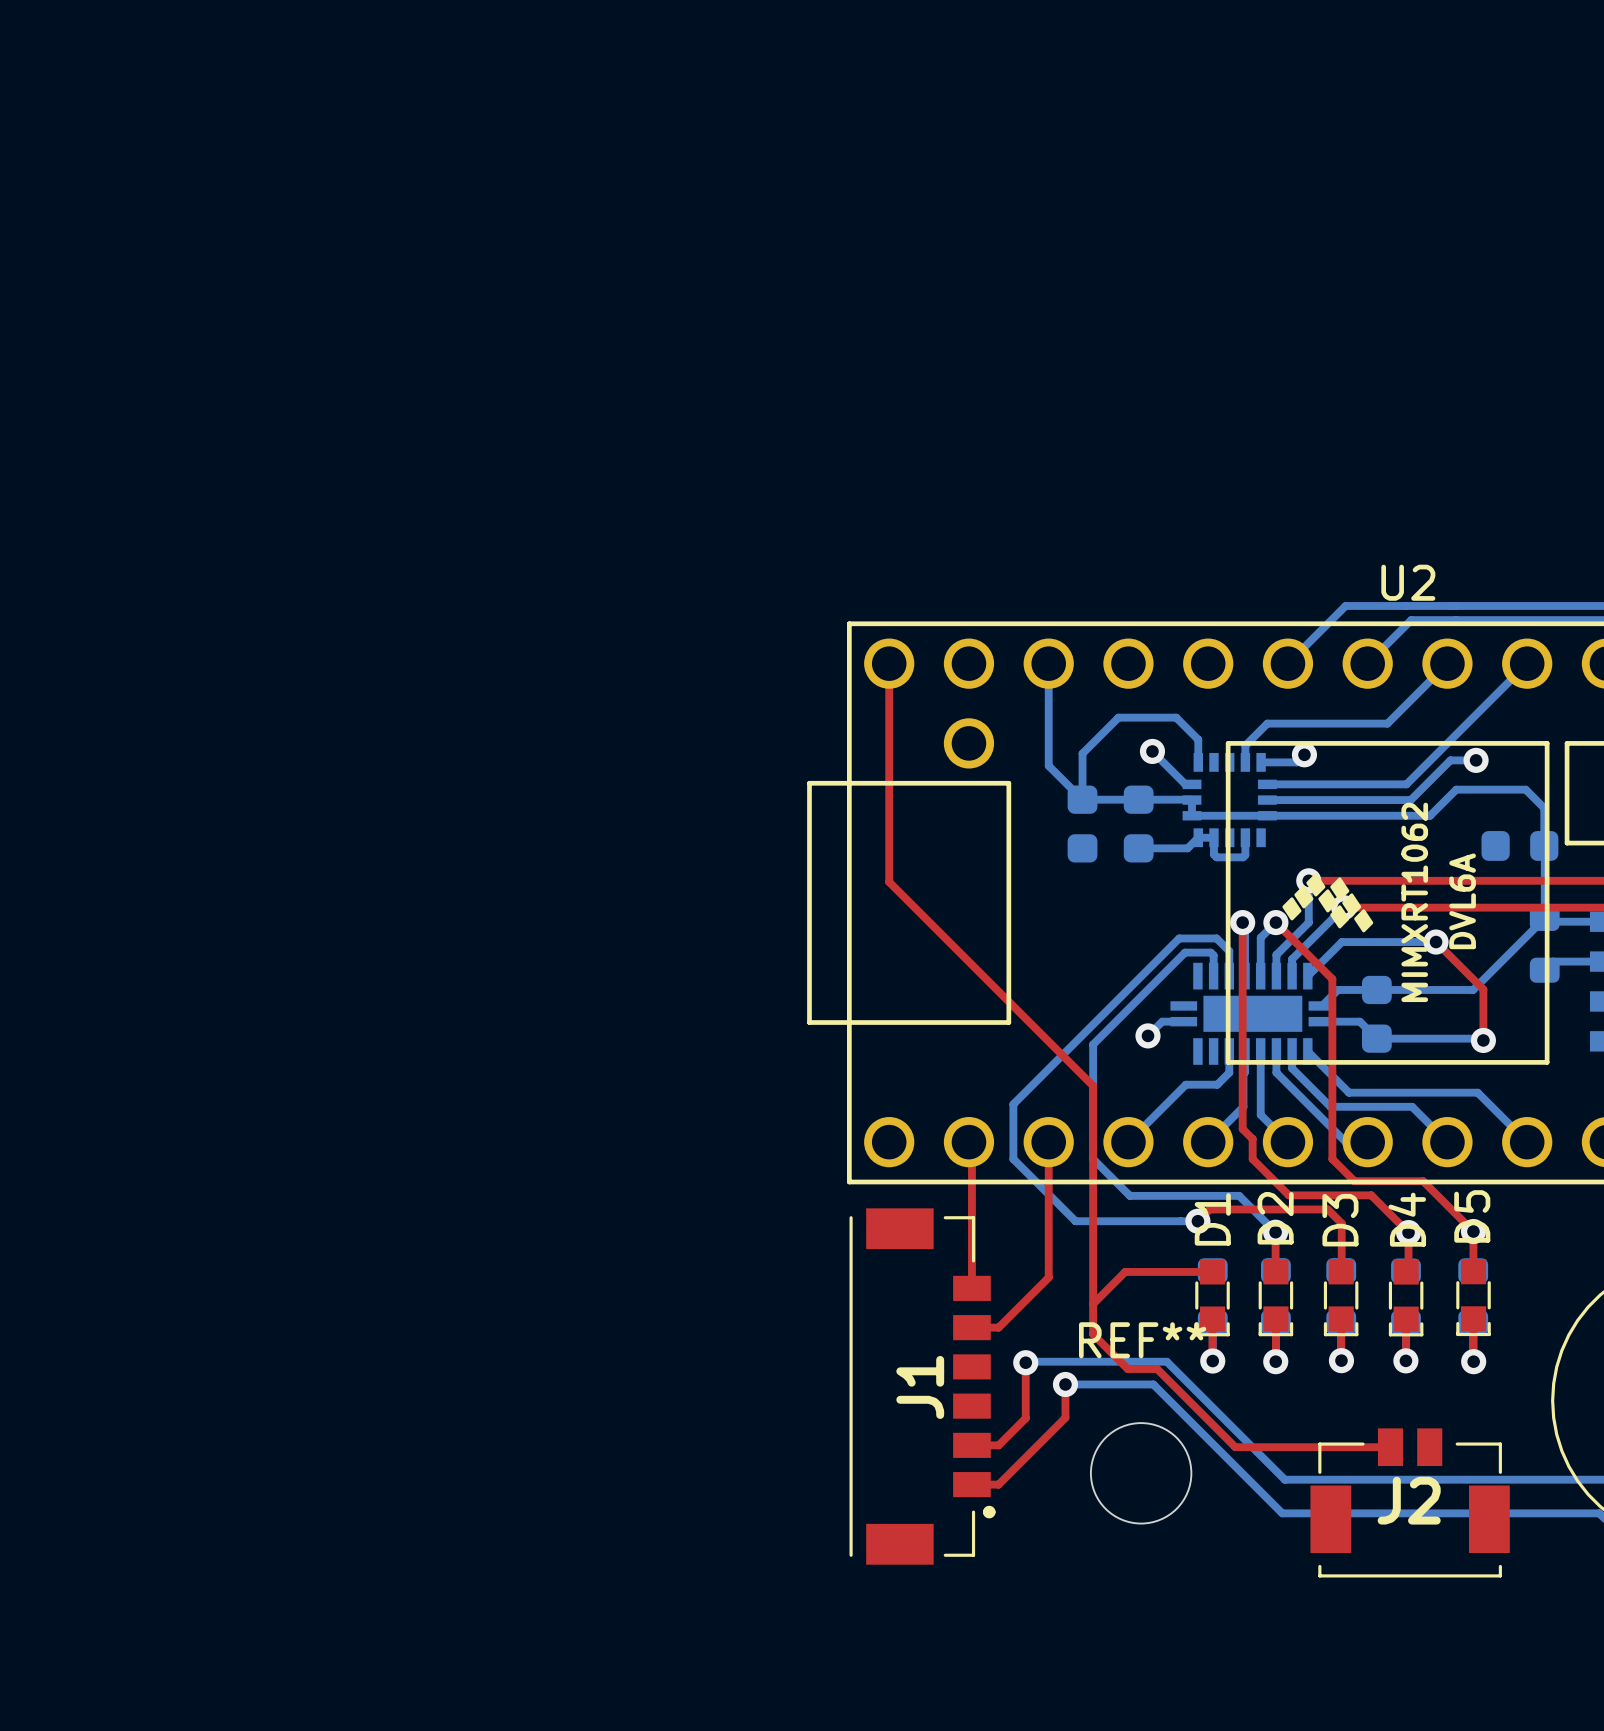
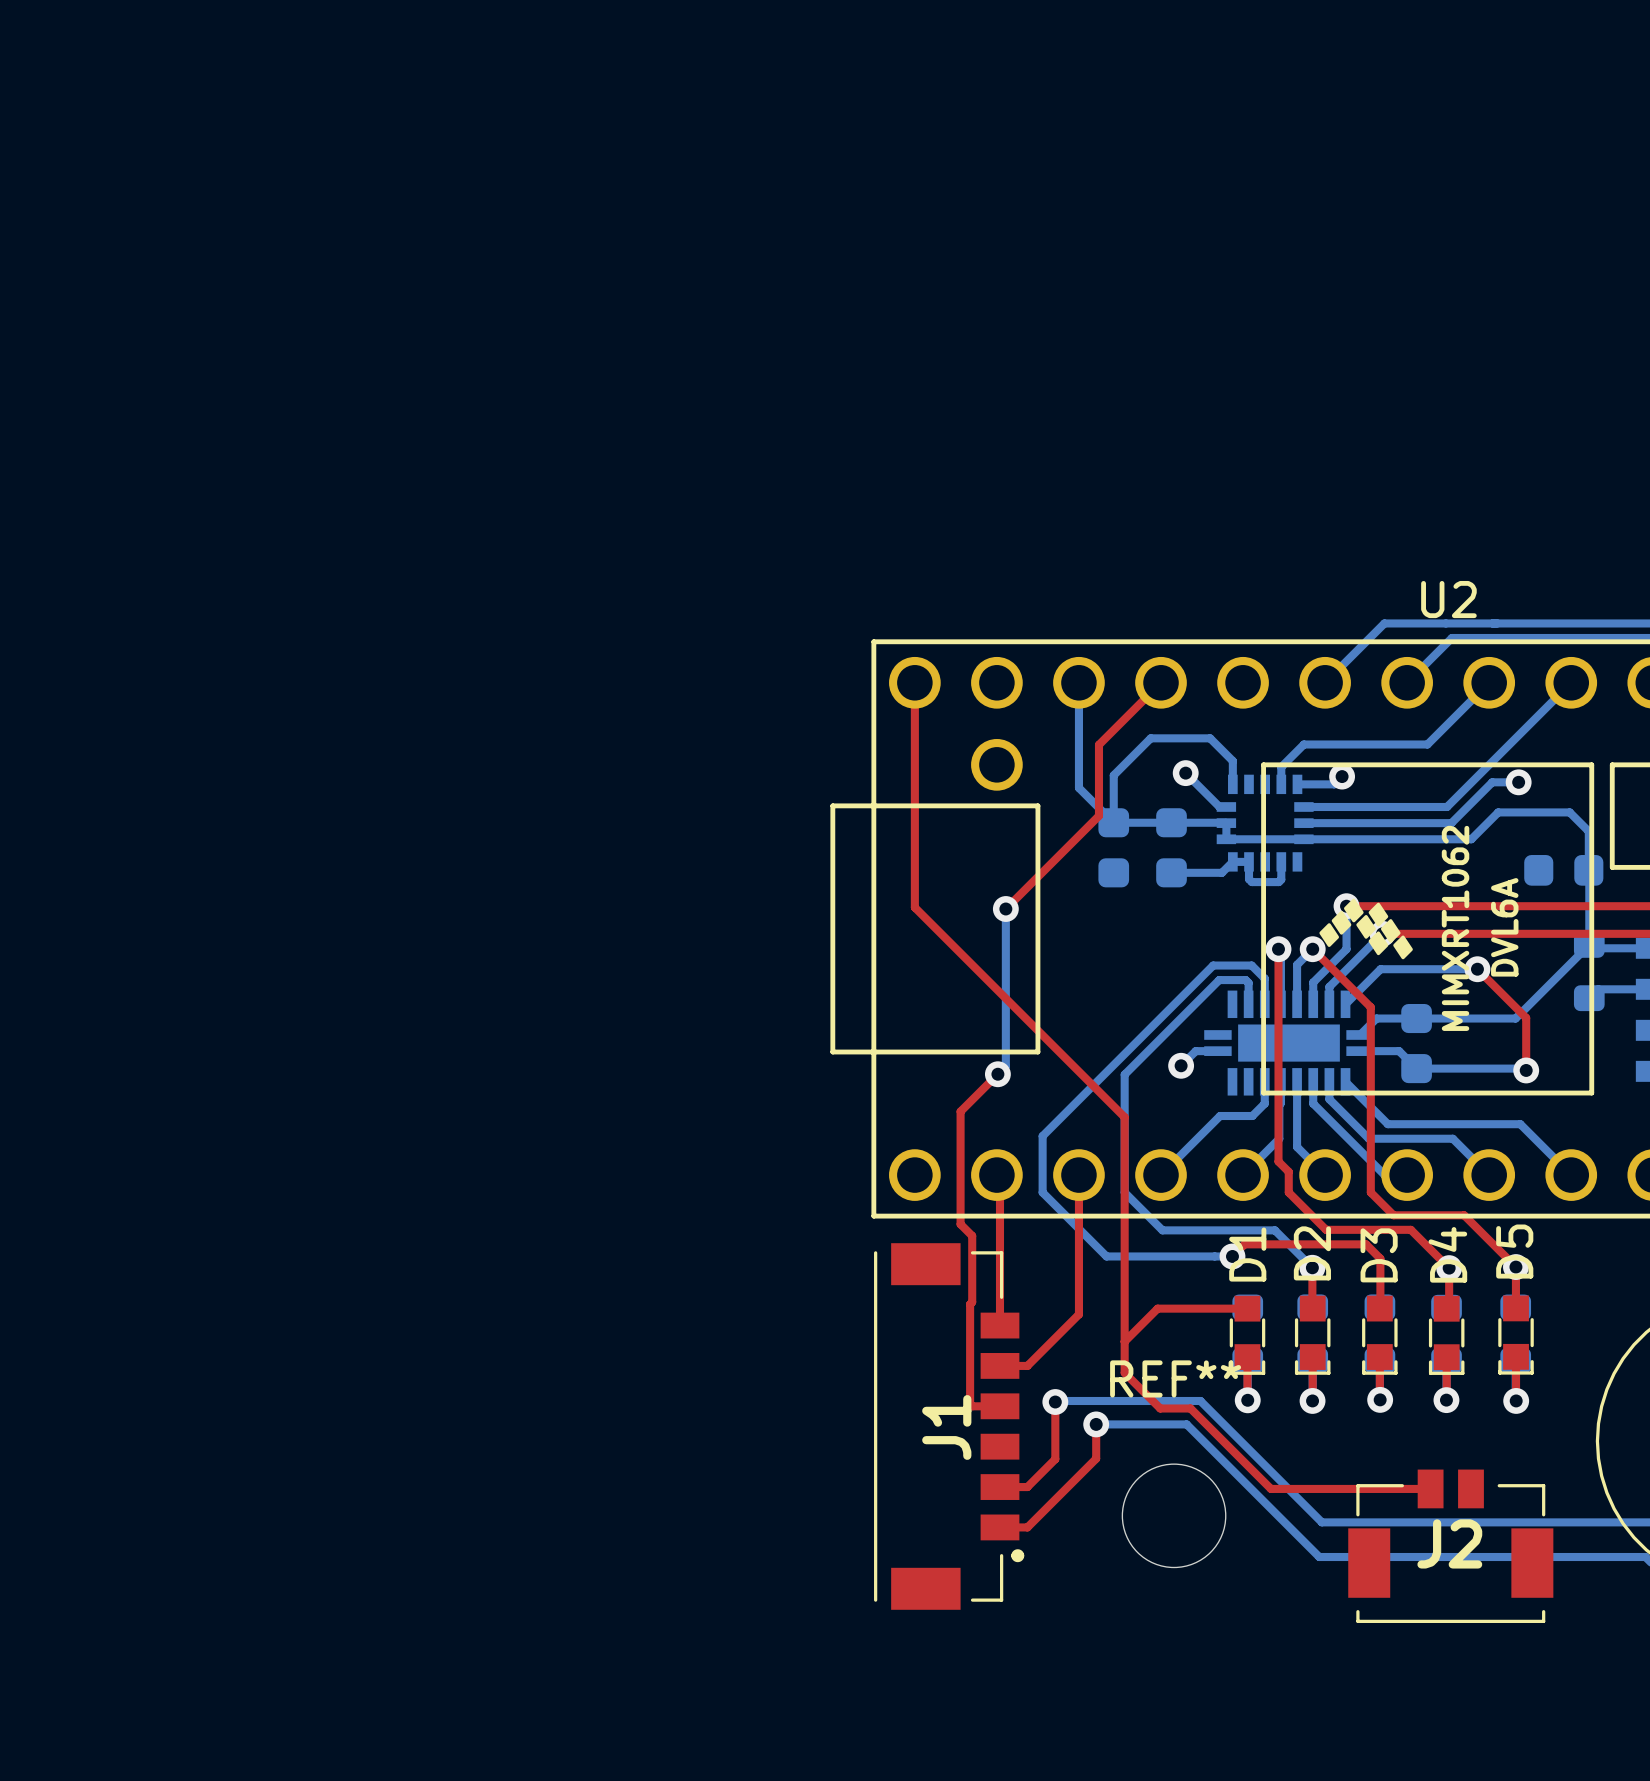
top track: none -> (1161, 682) (1098, 744) (1098, 815) (1004, 910)
bottom track: none -> (1005, 908) (1005, 1066) (997, 1074)
via: none -> (1005, 908)
top track: none -> (997, 1074) (960, 1111) (960, 1224) (972, 1235) (970, 1403) (972, 1406) (1000, 1406)
via: none -> (997, 1074)

